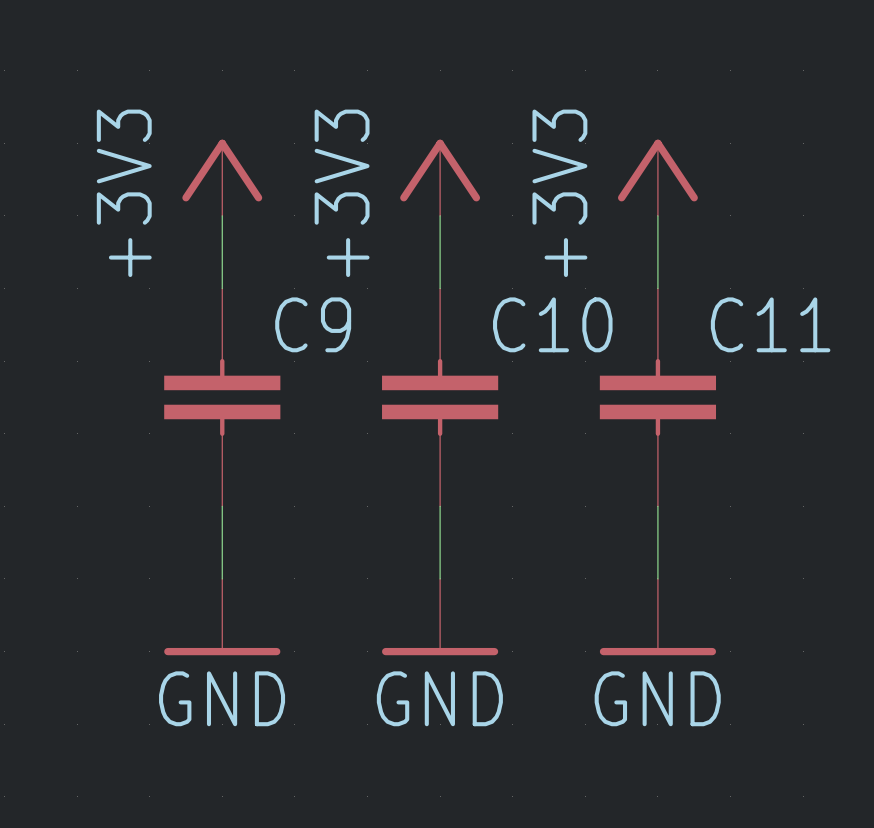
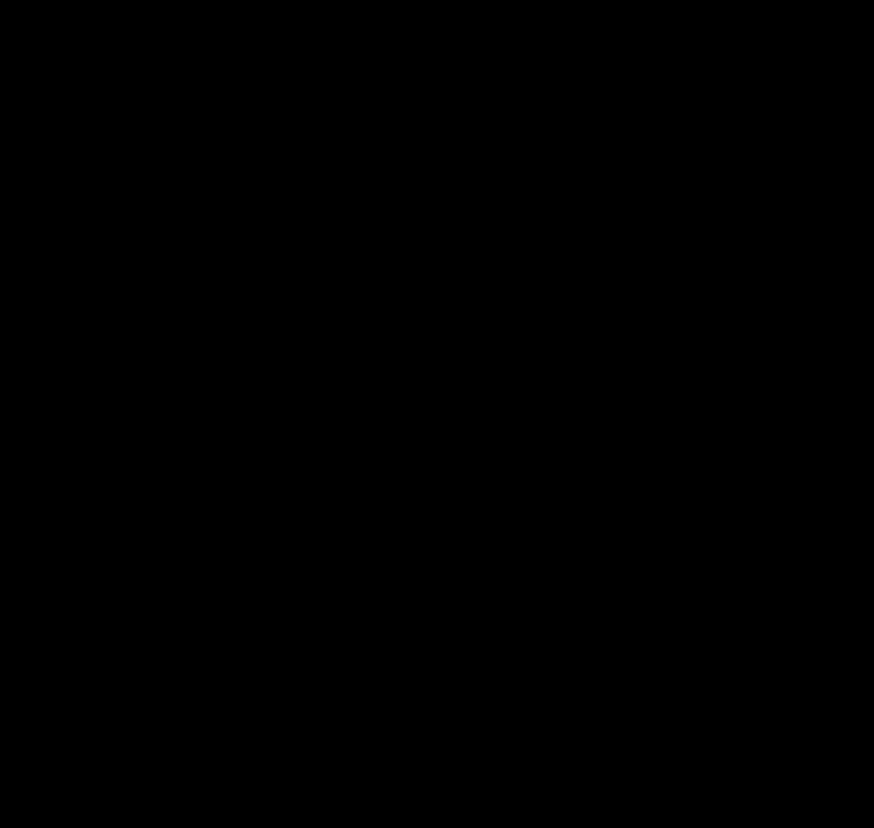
power symbol: +3V3 (222, 177) -> none
power symbol: +3V3 (440, 177) -> none
power symbol: +3V3 (657, 177) -> none
wire: (222, 215) (222, 288) -> none
wire: (440, 215) (440, 288) -> none
wire: (657, 215) (657, 288) -> none
C9: (222, 397) -> none
C10: (440, 397) -> none
C11: (657, 397) -> none
wire: (222, 506) (222, 578) -> none
wire: (440, 506) (440, 578) -> none
wire: (657, 506) (657, 578) -> none
power symbol: GND (222, 617) -> none
power symbol: GND (440, 617) -> none
power symbol: GND (657, 617) -> none

